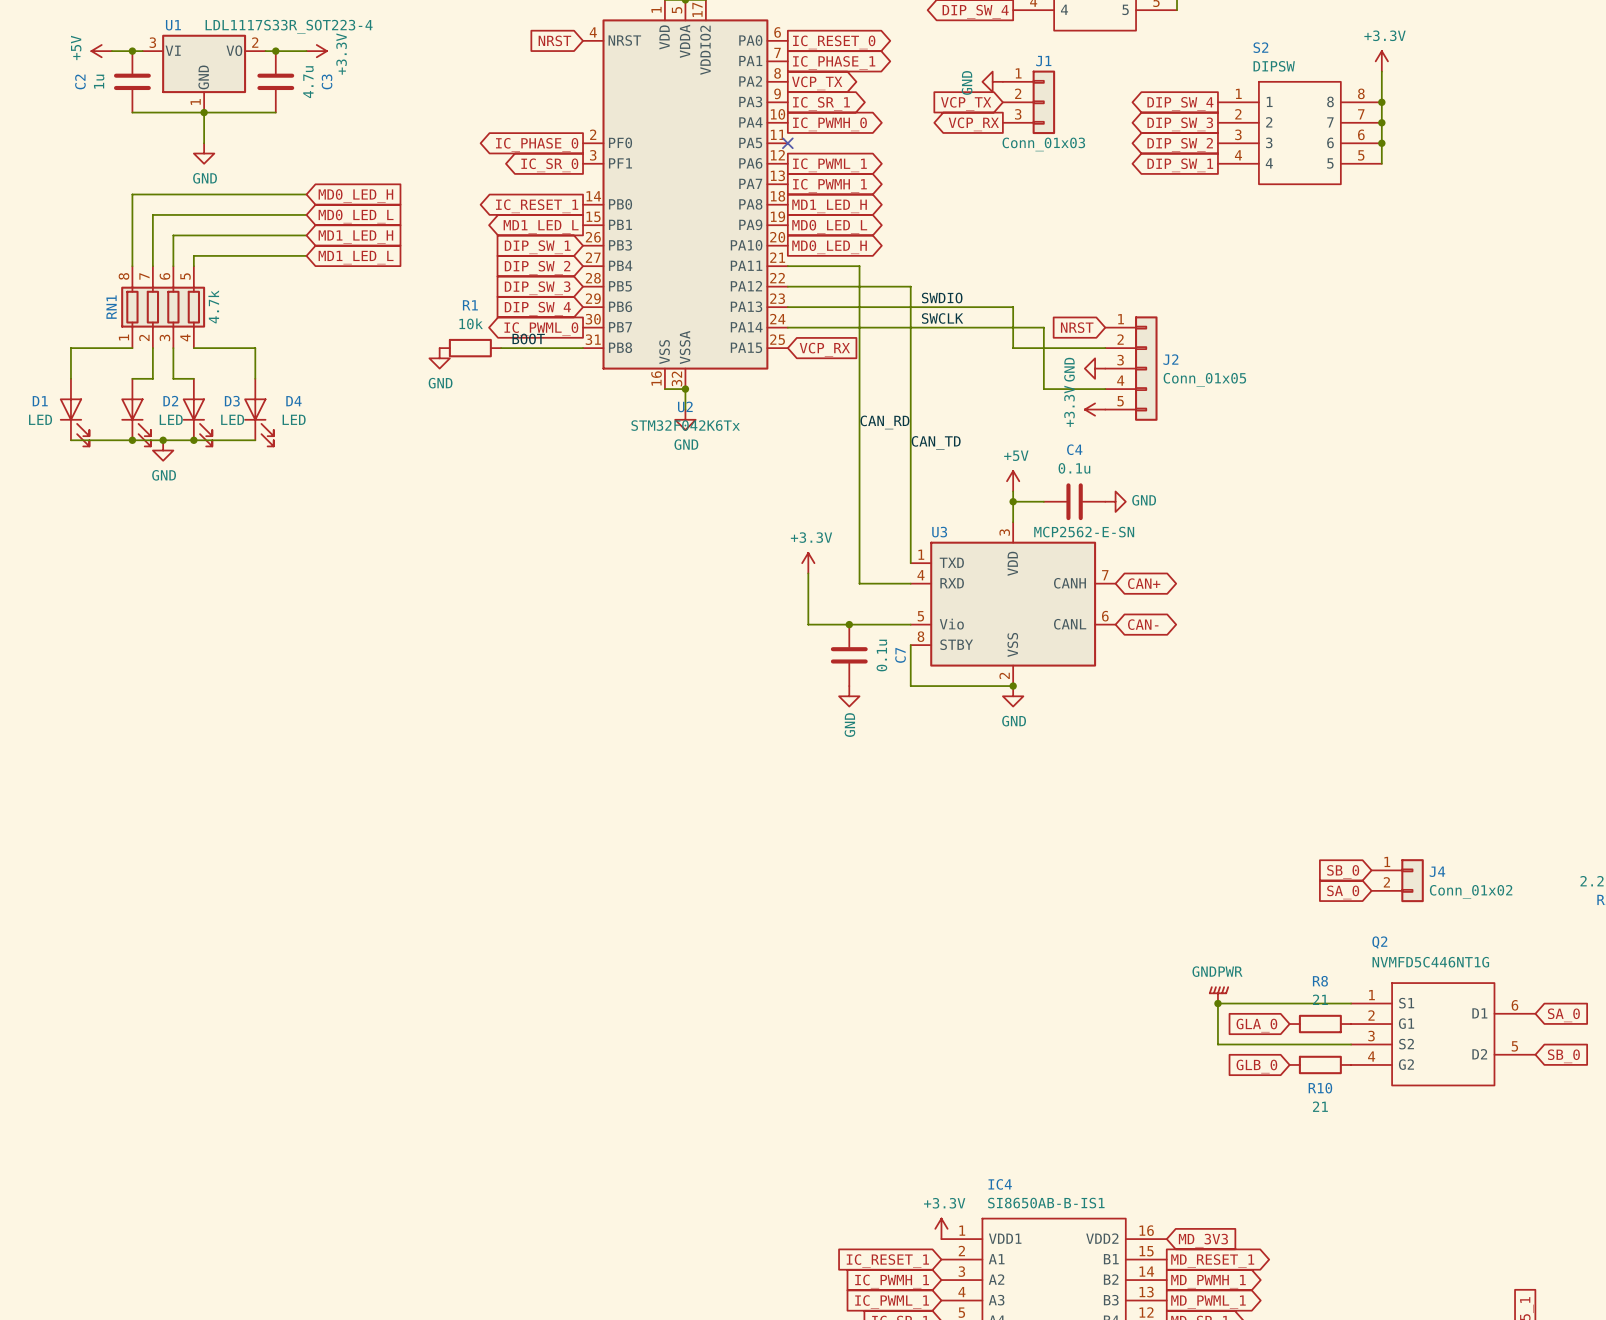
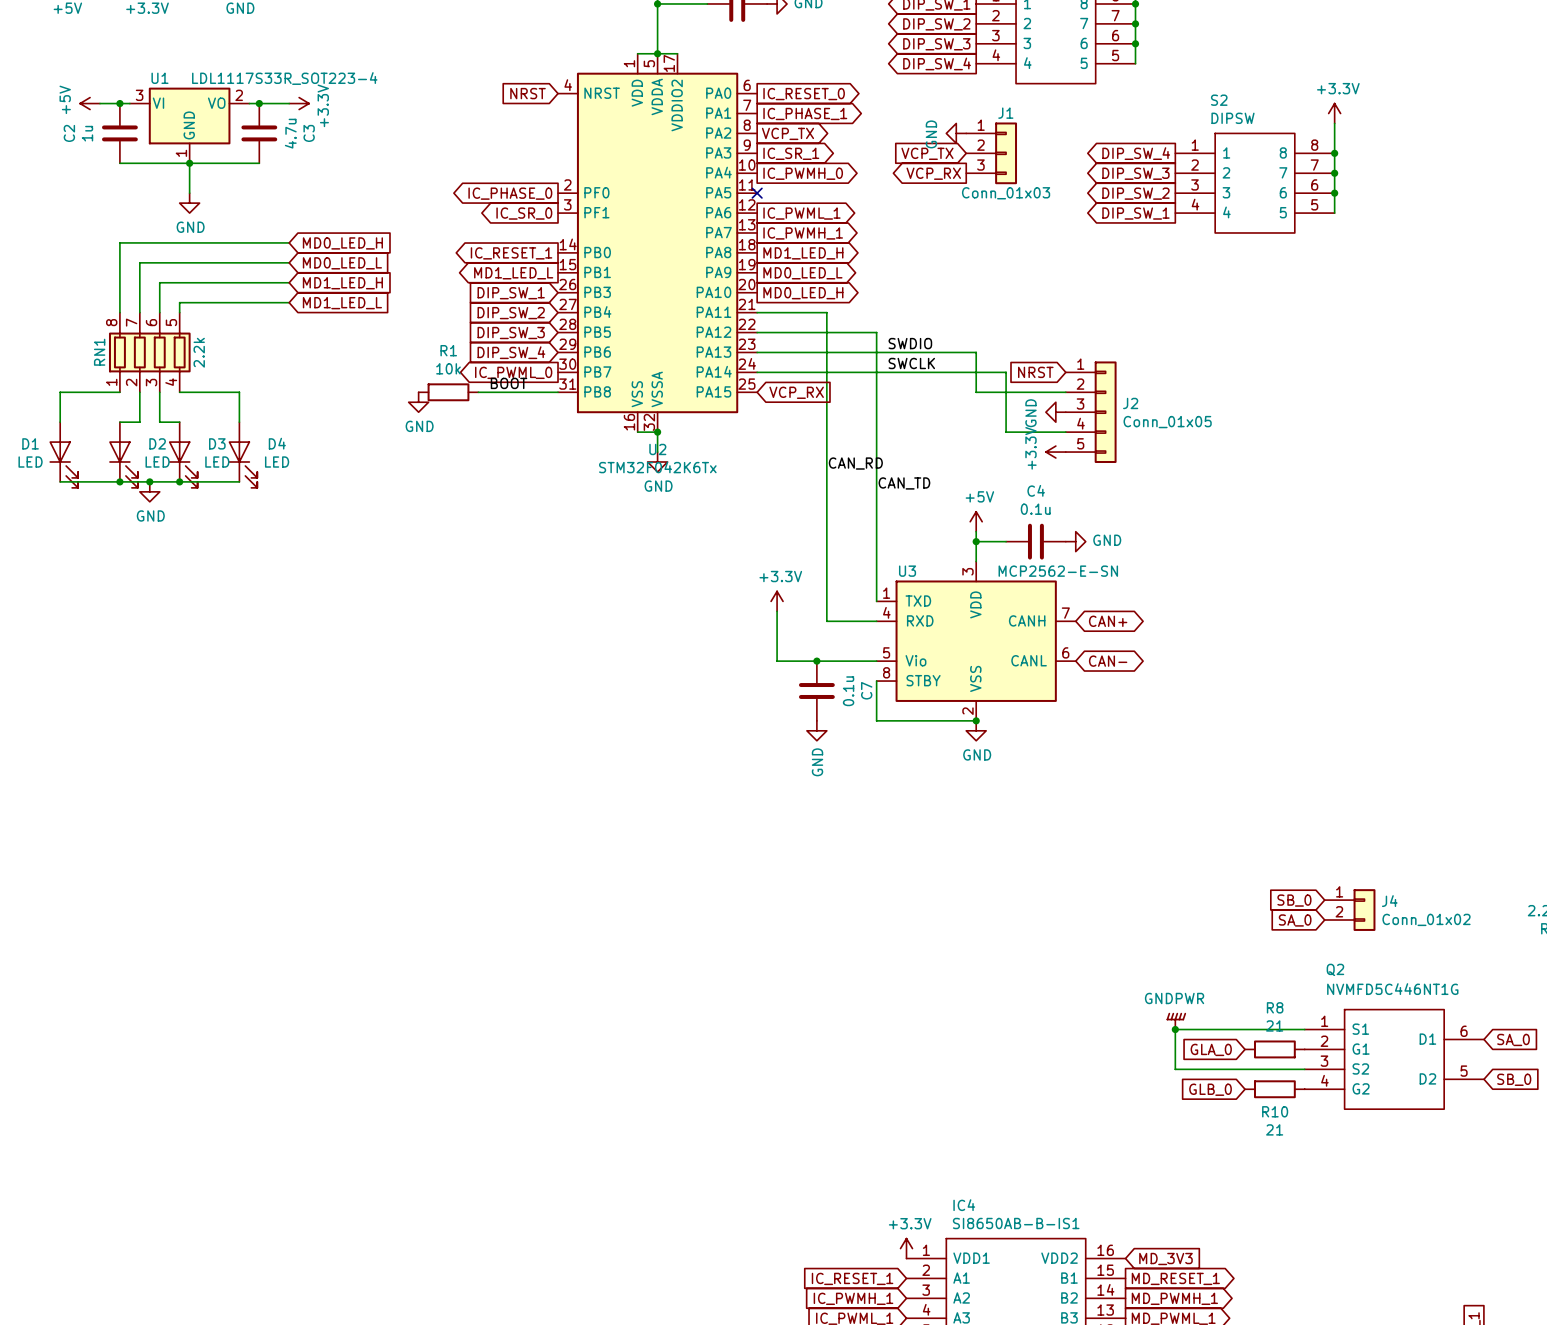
RN1 value: 4.7k (213, 306) -> 2.2k (199, 352)

